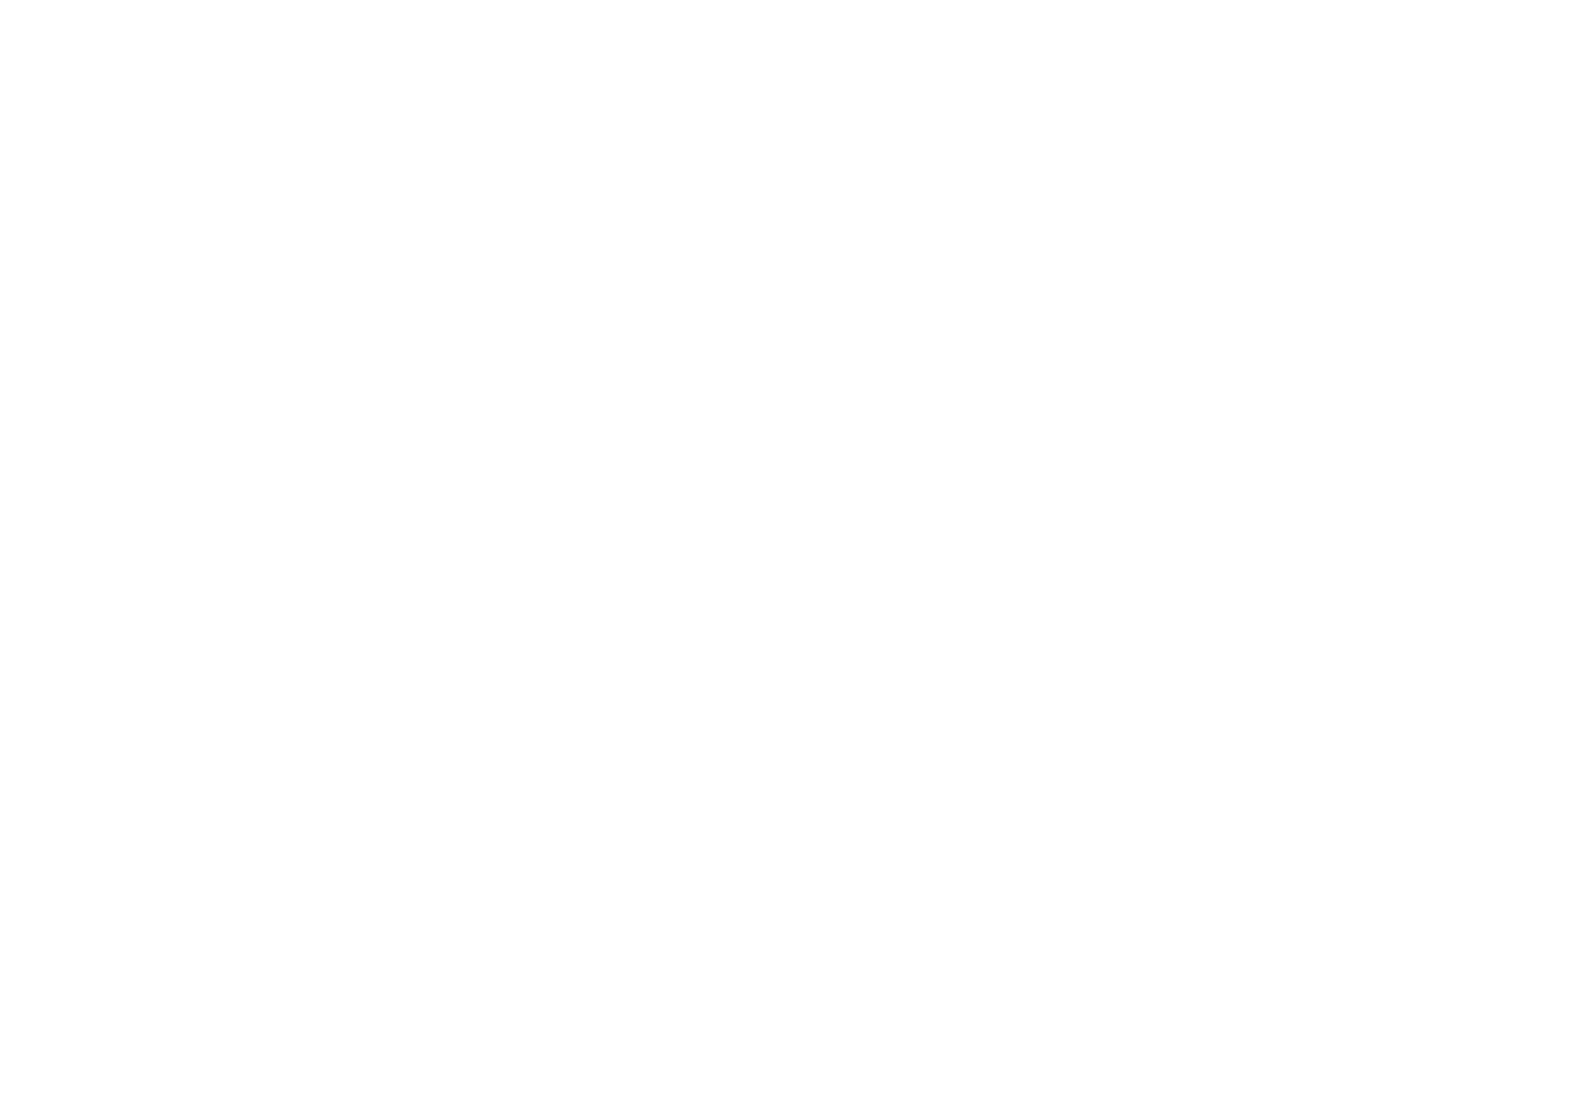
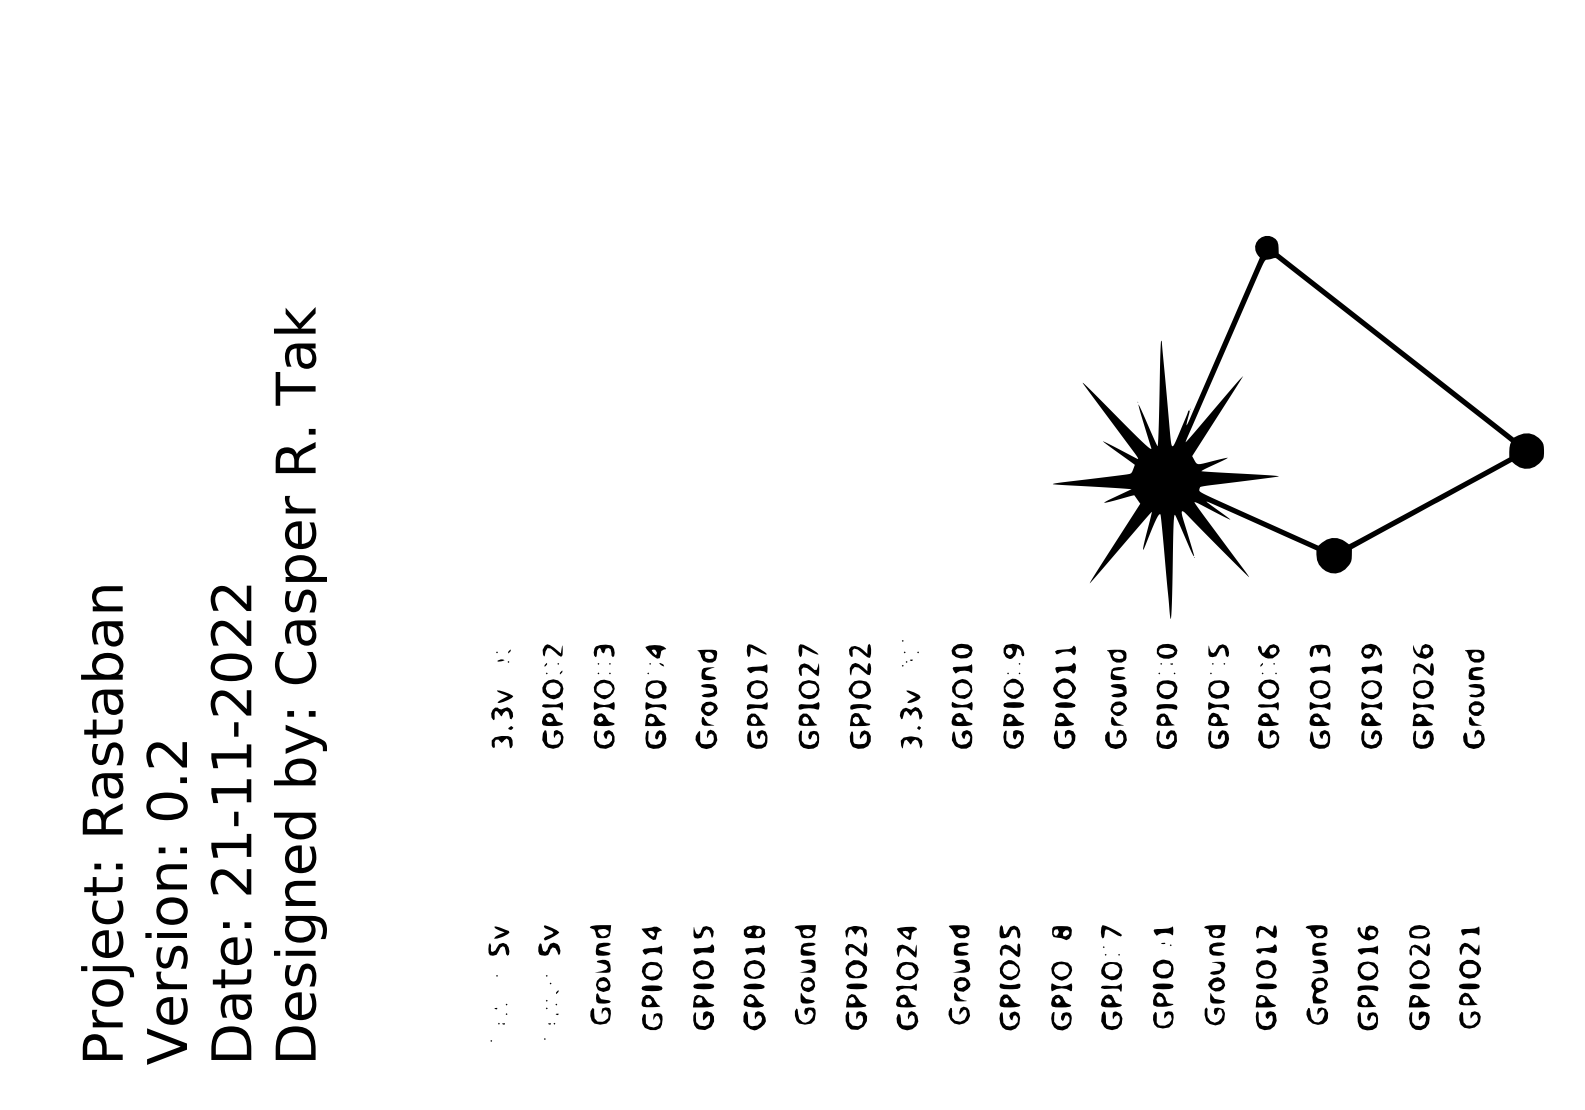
drawing: none -> [488, 235, 1545, 1042]
text: none -> Designed by: Casper R. Tak (300, 683)
text: none -> Date: 21-11-2022 (231, 822)
text: none -> Project: Rastaban (107, 823)
text: none -> Version: 0.2 (166, 903)

